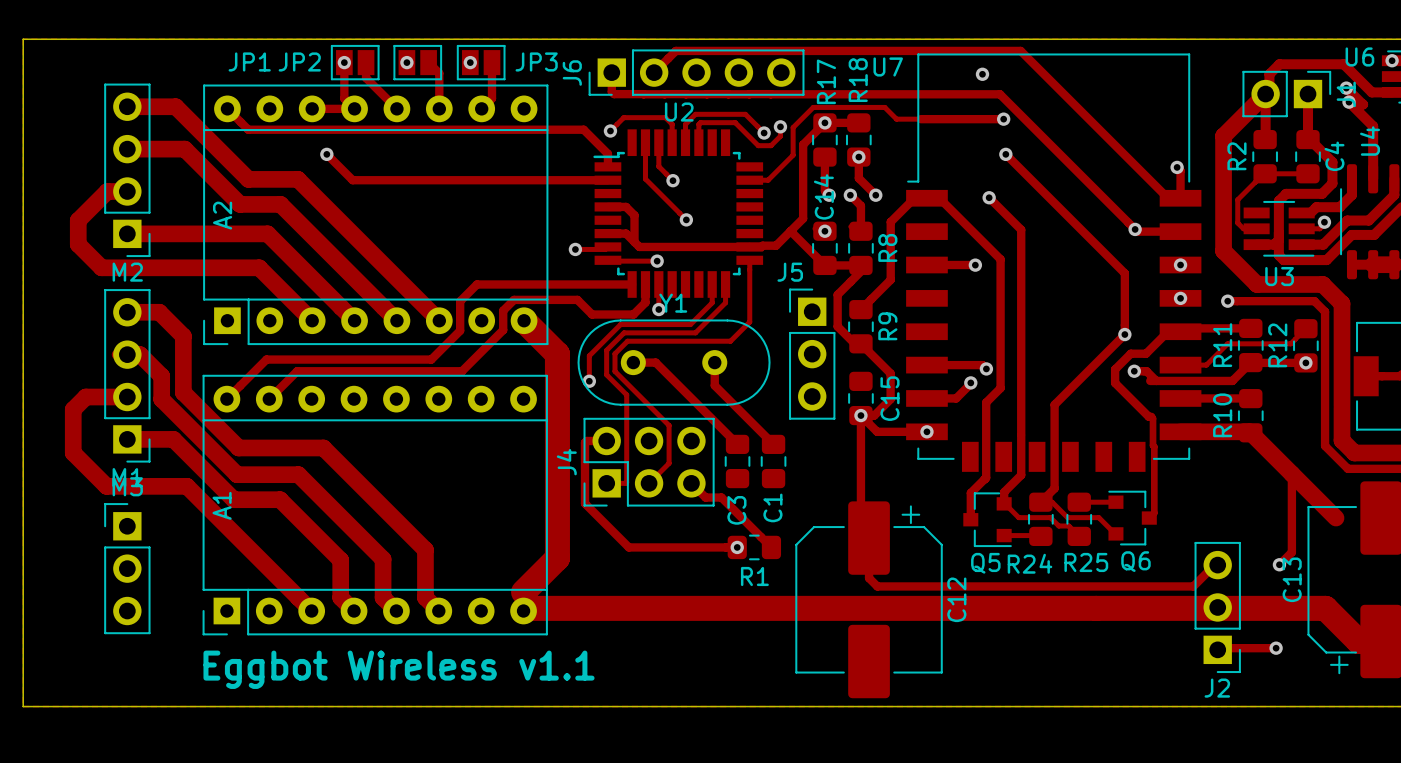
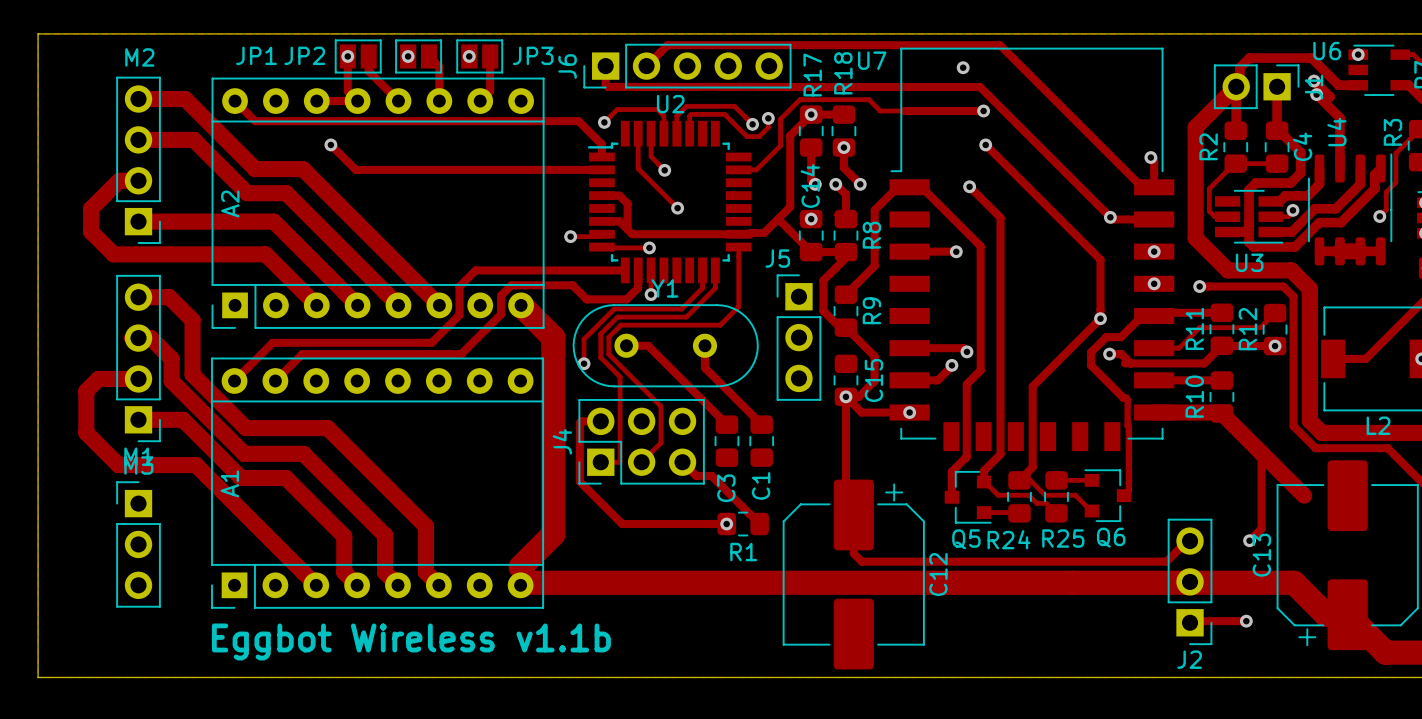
M2 name position: M2 (127, 272) -> M2 (139, 57)
text: Eggbot Wireless v1.1 (399, 669) -> Eggbot Wireless v1.1b (411, 641)

